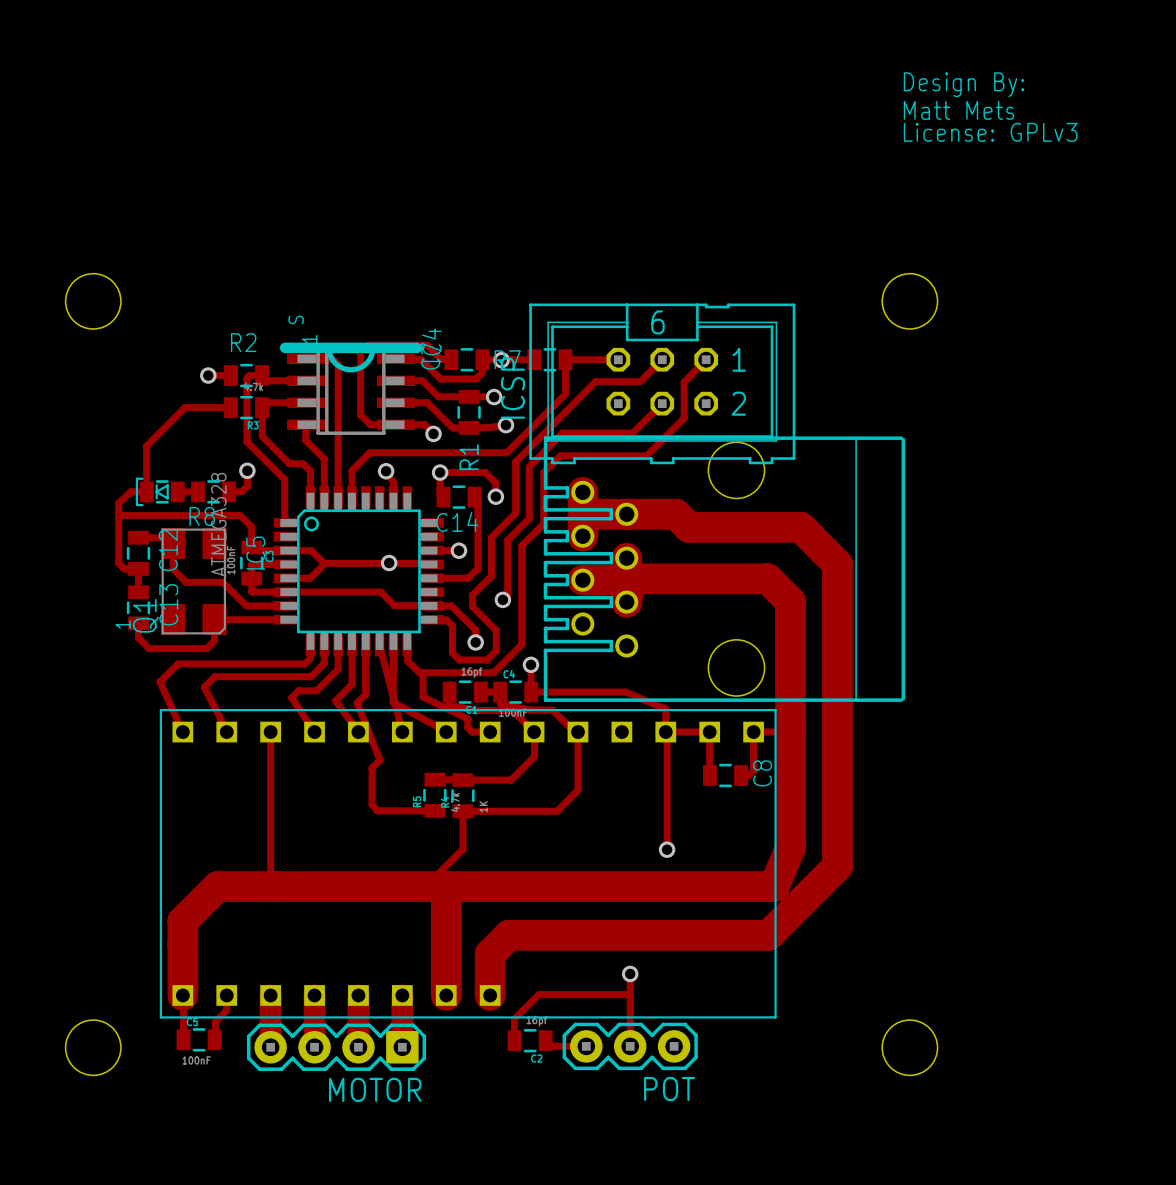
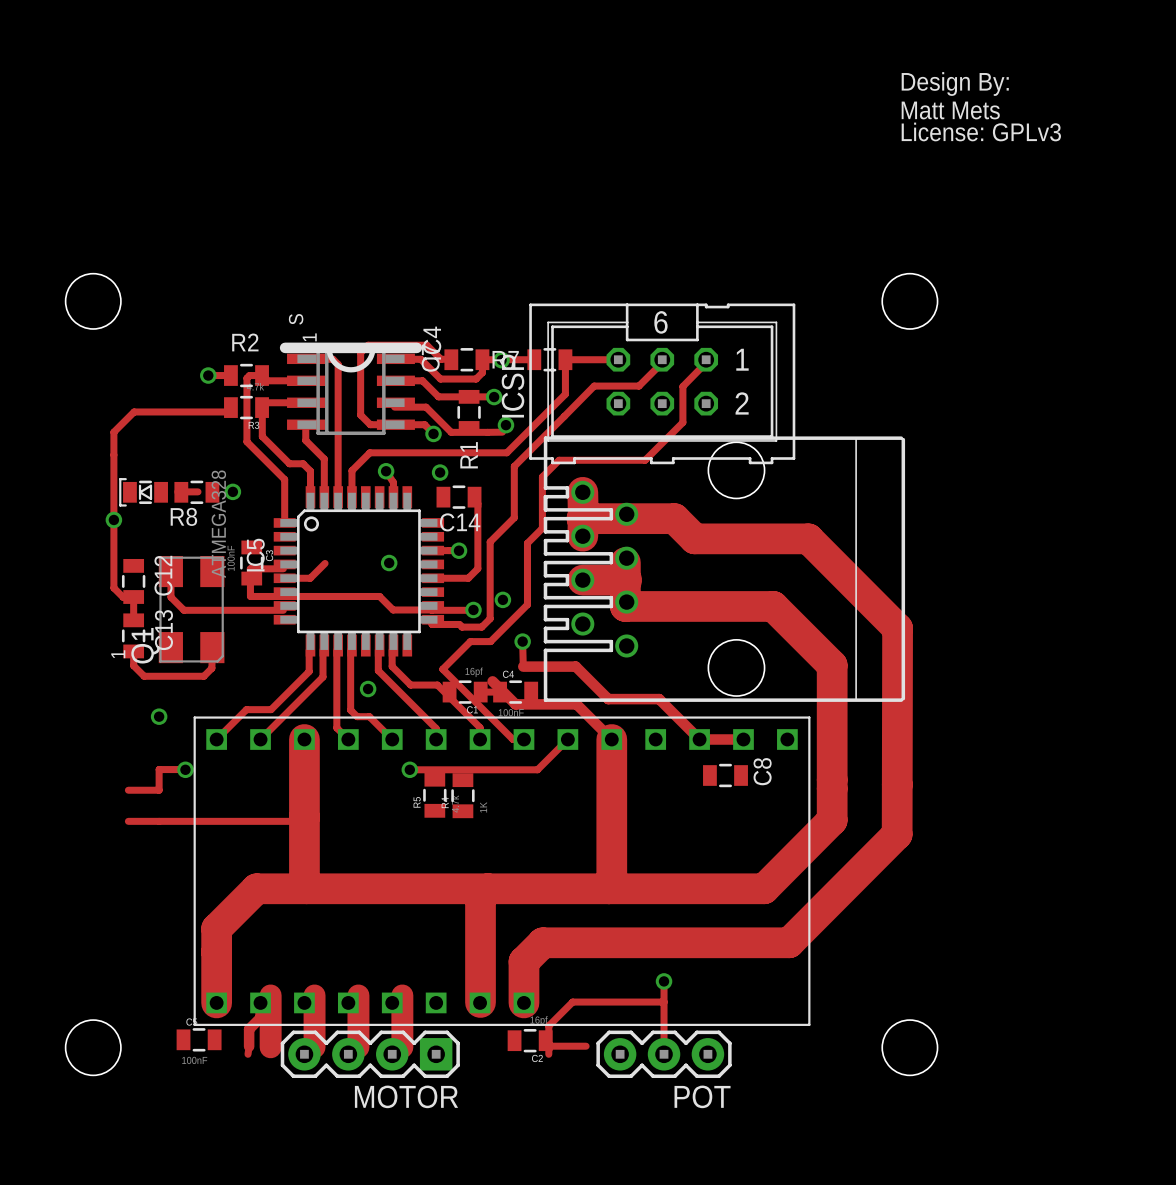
track: (662, 359) (640, 381) (595, 381) (515, 462) (515, 513) (491, 537) (491, 576) (472, 595) (472, 606) (496, 630) (496, 650) (487, 660) (459, 660) (452, 653) (452, 625) (446, 620) (433, 619) -> none
track: (706, 359) (684, 382) (684, 418) (646, 455) (560, 455) (543, 472) (543, 523) (521, 545) (521, 644) (493, 672) (419, 672) (407, 661) (407, 645) -> none
track: none -> (660, 364) (639, 386) (594, 386) (514, 466) (514, 517) (490, 541) (490, 618) (481, 627) (431, 624)
track: none -> (704, 364) (682, 386) (682, 422) (645, 460) (559, 460) (542, 476) (542, 528) (527, 543) (527, 604) (490, 641) (470, 641) (442, 669) (512, 739) (523, 739)
track: (395, 402) (427, 402) (452, 427) (505, 425) -> none
track: (662, 403) (632, 433) (562, 433) (529, 466) (529, 518) (507, 540) (507, 595) (502, 599) -> none
track: (230, 407) (185, 407) (146, 445) (146, 491) (130, 491) (118, 503) (118, 563) (124, 568) (138, 568) (138, 592) -> none
track: none -> (394, 407) (426, 407) (451, 432) (502, 432)
track: none -> (229, 411) (134, 411) (113, 432) (113, 588) (123, 597) (133, 597) (133, 620)
track: (247, 470) (247, 486) (241, 491) (228, 491) -> none
via position: (247, 470) -> (232, 491)
part position: (160, 491) -> (143, 492)
R8 position: (213, 491) -> (196, 492)
track: (495, 496) (495, 483) (485, 472) (440, 472) (440, 493) (443, 497) -> none
via: (495, 496) -> none
track: (583, 514) (675, 514) (689, 527) (801, 527) (837, 564) (837, 866) (768, 935) (509, 935) (490, 954) (490, 995) -> none
track: (118, 515) (240, 515) (251, 527) (251, 547) (261, 550) (311, 550) (324, 563) (433, 564) -> none
track: none -> (581, 518) (674, 518) (694, 538) (808, 538) (897, 628) (897, 834) (789, 942) (542, 942) (523, 961) (523, 1002)
via: none -> (113, 519)
track: (138, 537) (167, 537) (173, 543) (173, 569) (186, 582) (222, 582) (246, 605) (284, 605) -> none
C12 position: (138, 553) -> (133, 581)
track: (626, 558) (626, 602) (631, 578) (767, 578) (790, 601) (790, 847) (774, 886) (217, 886) (182, 921) (183, 1039) -> none
track: none -> (625, 562) (625, 606) (773, 606) (832, 665) (832, 820) (764, 888) (256, 888) (216, 928) (217, 1003)
track: (284, 564) (251, 564) (251, 591) (380, 592) (394, 605) (451, 605) (475, 630) (475, 642) -> none
track: none -> (170, 565) (170, 597) (184, 610) (283, 610)
track: none -> (283, 568) (250, 568) (250, 596) (379, 596) (393, 609) (473, 609)
Q1 position: (193, 581) -> (191, 609)
C13 position: (138, 607) -> (133, 635)
via: none -> (473, 609)
track: (284, 619) (214, 619) (214, 640) (206, 648) (149, 648) (138, 637) (138, 623) -> none
text position: 1 (123, 624) -> 1 (118, 654)
track: none -> (522, 641) (523, 666) (575, 666) (608, 699) (659, 699) (699, 739)
via: none -> (522, 641)
via: (475, 642) -> none
track: (310, 645) (310, 658) (304, 663) (178, 663) (160, 681) (182, 732) -> none
track: (324, 645) (324, 663) (311, 676) (214, 676) (204, 687) (226, 732) -> none
track: (338, 645) (338, 669) (316, 690) (298, 690) (291, 697) (314, 732) -> none
track: (351, 645) (351, 684) (335, 700) (358, 732) -> none
track: (365, 645) (365, 694) (357, 703) (379, 760) (372, 768) (372, 804) (377, 810) (434, 810) -> none
track: (379, 645) (402, 731) -> none
track: (393, 645) (393, 702) (446, 732) -> none
track: none -> (212, 647) (211, 668) (203, 676) (144, 676) (133, 665) (133, 651)
track: none -> (309, 649) (309, 671) (271, 709) (246, 709) (216, 739)
track: none -> (323, 649) (323, 677) (260, 739)
track: none -> (336, 649) (336, 727) (348, 739)
track: none -> (350, 649) (350, 710) (357, 716) (369, 716) (392, 739)
track: none -> (378, 649) (378, 670) (436, 728) (436, 739)
track: none -> (392, 649) (392, 666) (410, 685) (437, 685) (480, 727) (479, 739)
track: (530, 664) (531, 692) (625, 692) (665, 709) (665, 732) -> none
via: (530, 664) -> none
track: (422, 672) (422, 696) (467, 718) (467, 727) (472, 732) (490, 732) -> none
track: none -> (492, 681) (515, 704) (576, 704) (611, 739)
via: none -> (368, 689)
track: (449, 692) (449, 705) (477, 710) (512, 710) (534, 732) (534, 756) (510, 780) (434, 779) -> none
track: (500, 692) (500, 703) (529, 710) (552, 710) (574, 731) (578, 731) (577, 790) (557, 811) (462, 811) (462, 849) (429, 883) (432, 886) (446, 886) (445, 995) -> none
via: none -> (159, 716)
track: (790, 726) (785, 732) (753, 732) (753, 770) (748, 775) (741, 775) -> none
track: (270, 732) (270, 883) (273, 886) -> none
track: (665, 732) (709, 732) (709, 775) -> none
track: (665, 732) (667, 849) -> none
track: none -> (304, 739) (304, 886) (306, 888)
track: none -> (568, 739) (537, 769) (409, 769)
track: none -> (611, 739) (611, 885) (608, 888)
track: none -> (699, 739) (743, 739)
track: none -> (185, 769) (159, 769) (159, 790) (128, 790)
via: none -> (185, 769)
via: none -> (409, 769)
track: none -> (304, 817) (305, 821) (128, 821)
via: (667, 849) -> none
part position: (468, 863) -> (502, 871)
track: none -> (487, 888) (480, 896) (479, 1003)
track: (630, 973) (630, 1046) -> none
via position: (630, 973) -> (664, 981)
track: none -> (664, 981) (664, 1054)
track: (630, 994) (538, 994) (514, 1018) (514, 1040) -> none
track: (226, 995) (226, 1010) (215, 1021) (214, 1039) -> none
track: none -> (260, 1002) (260, 1017) (249, 1029) (248, 1054)
track: none -> (664, 1002) (572, 1002) (548, 1025) (548, 1054)
POT position: (630, 1046) -> (664, 1054)
MOTOR position: (336, 1047) -> (370, 1054)

